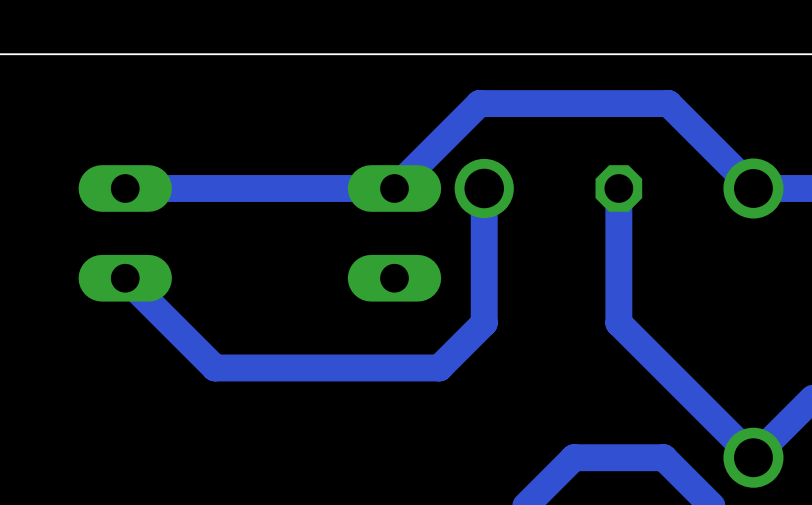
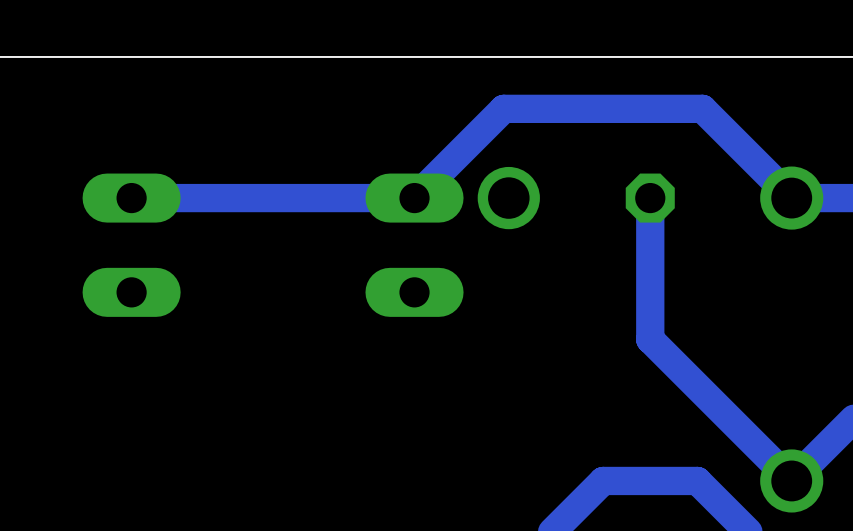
track: (484, 188) (484, 323) (439, 367) (214, 367) (125, 278) -> none

